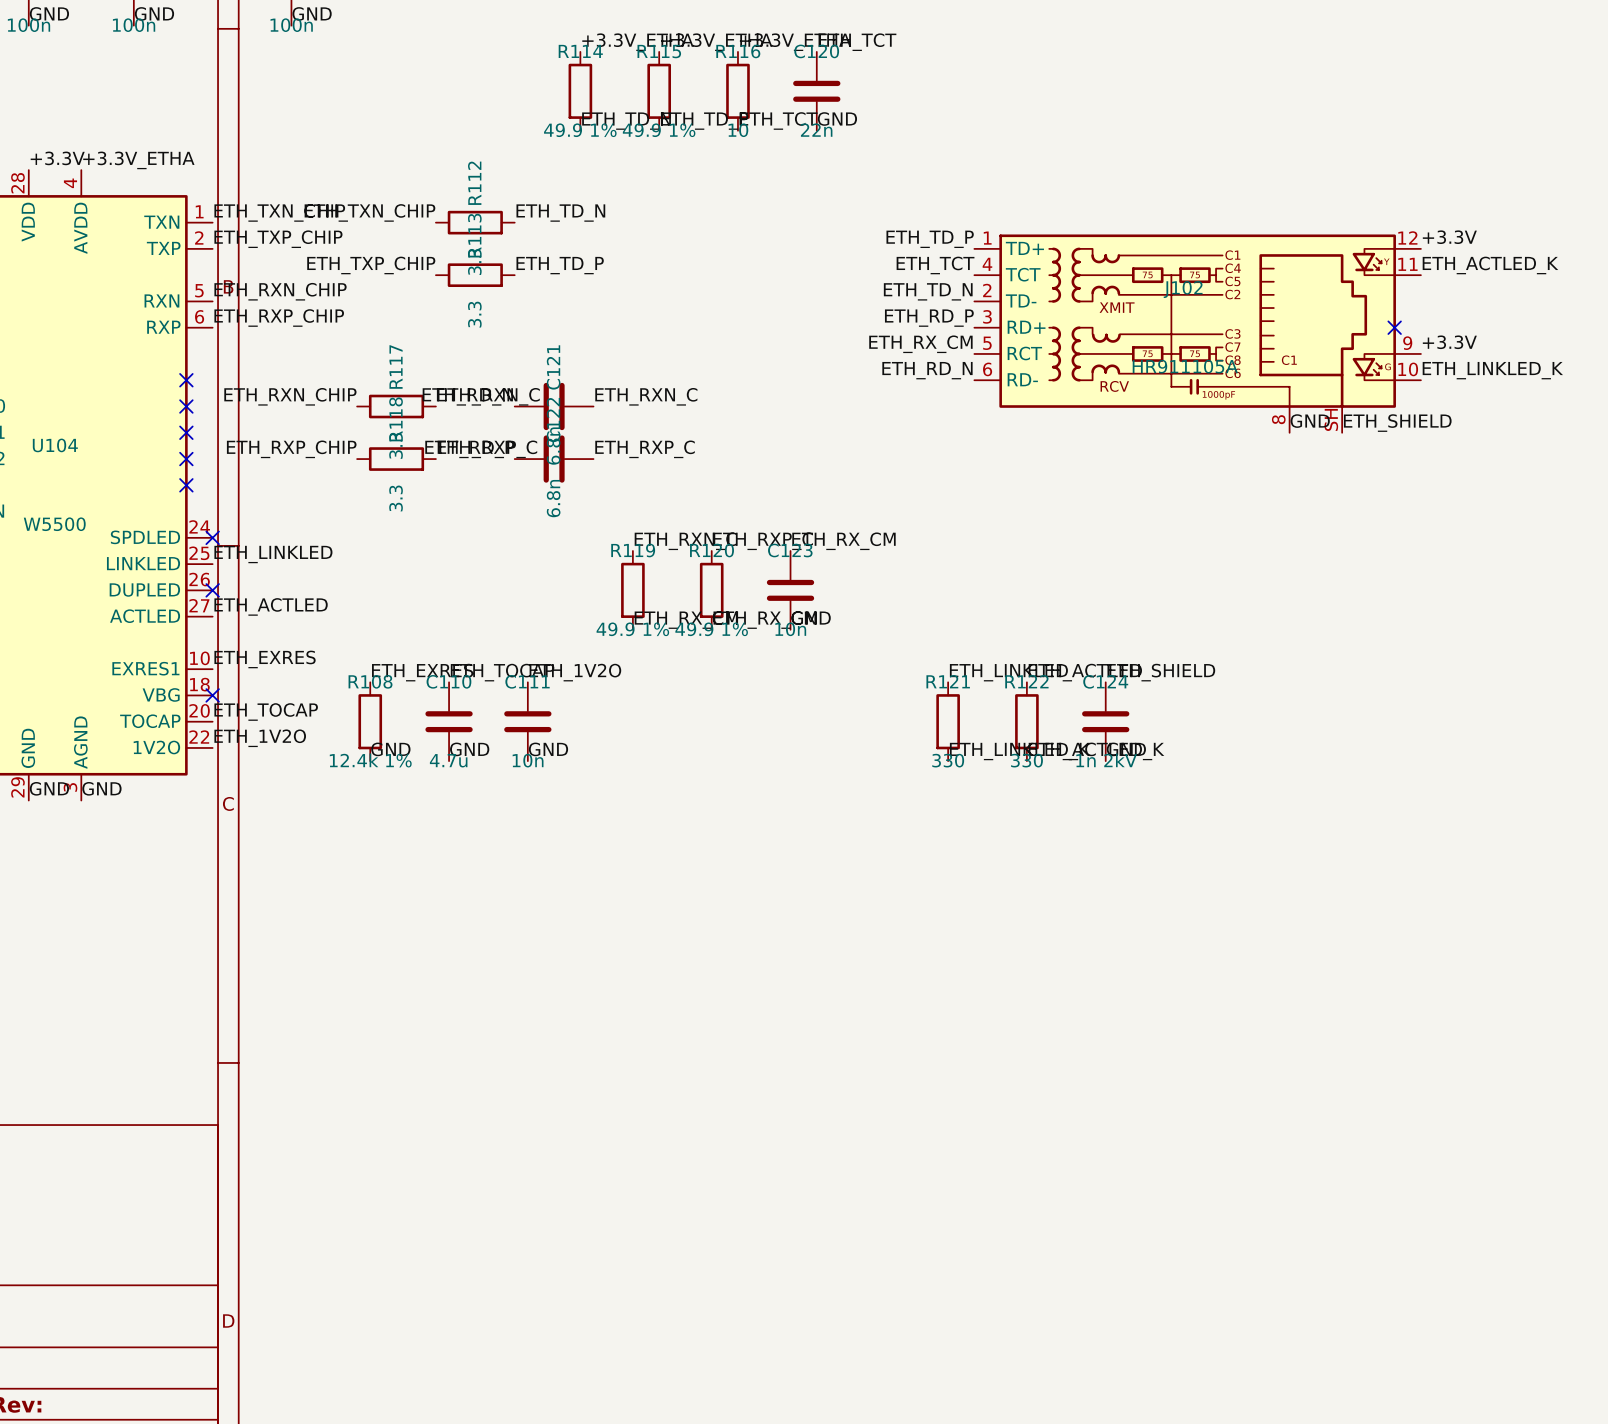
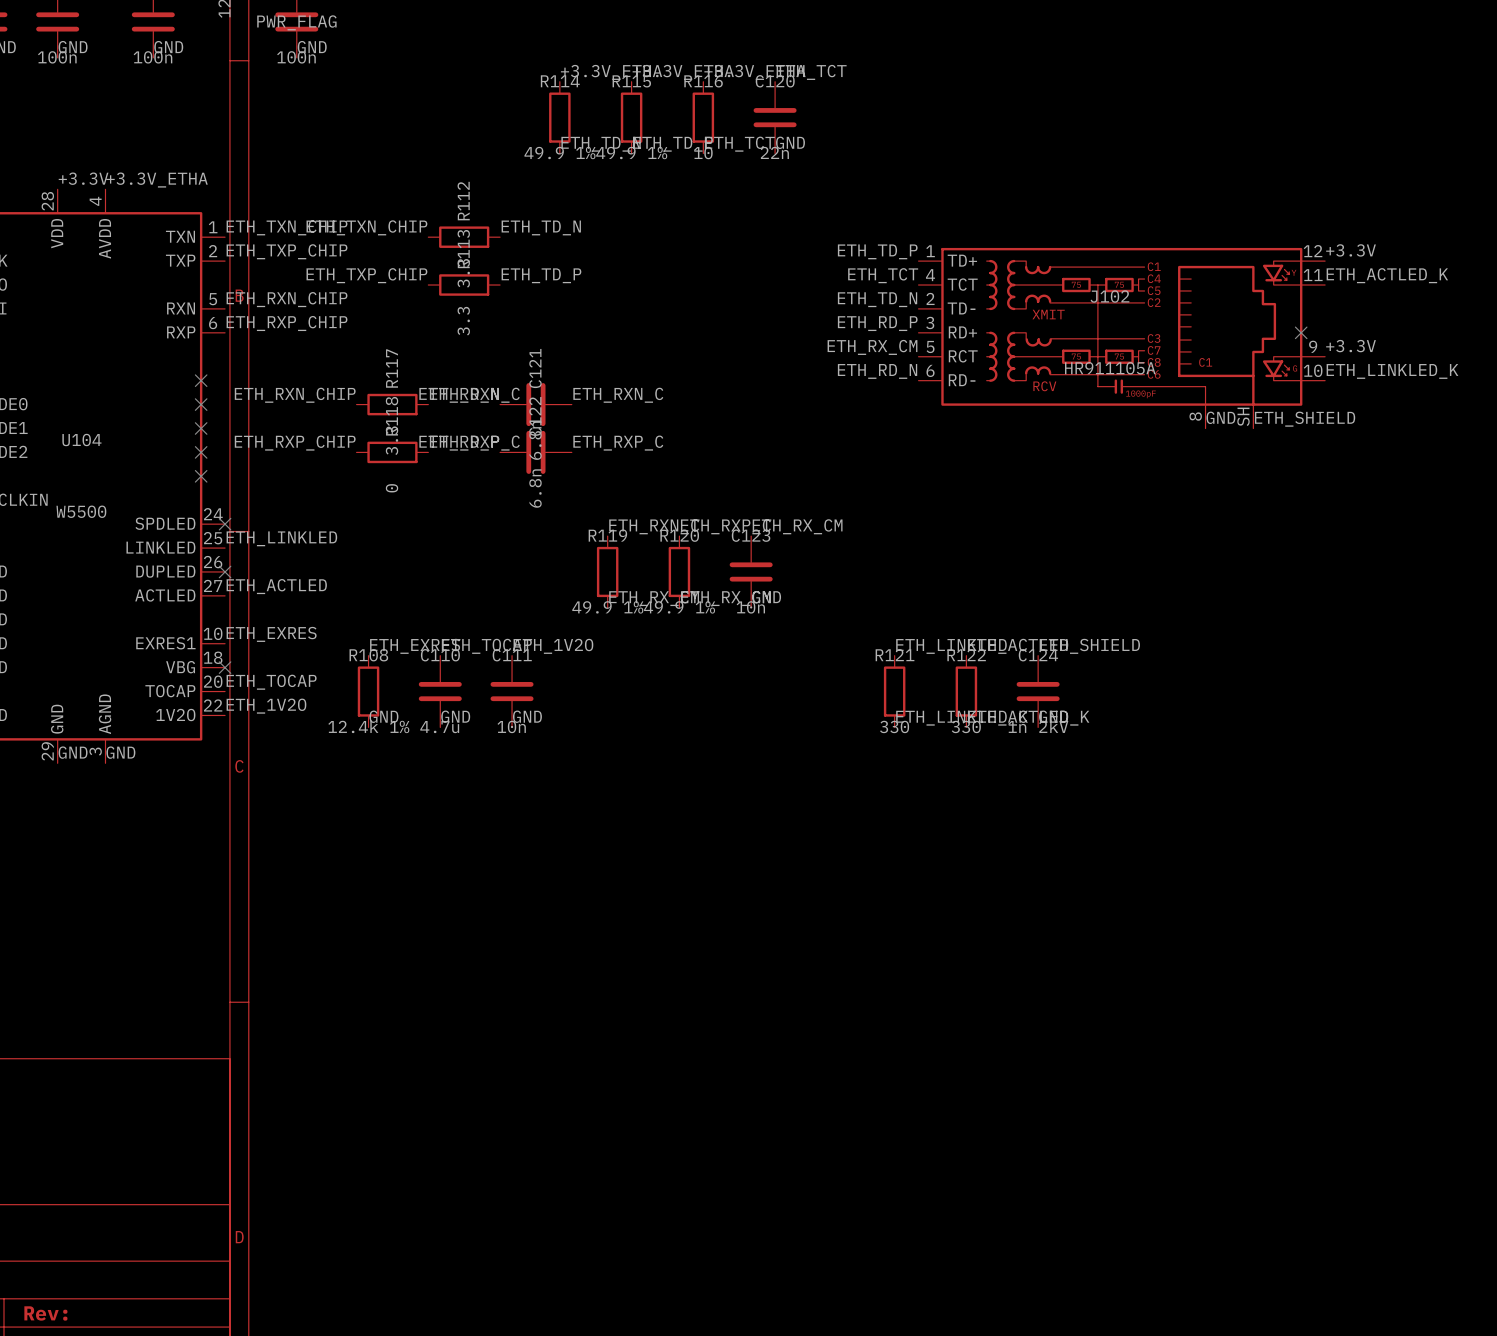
R118 value: 3.3 (396, 498) -> 0 (392, 488)

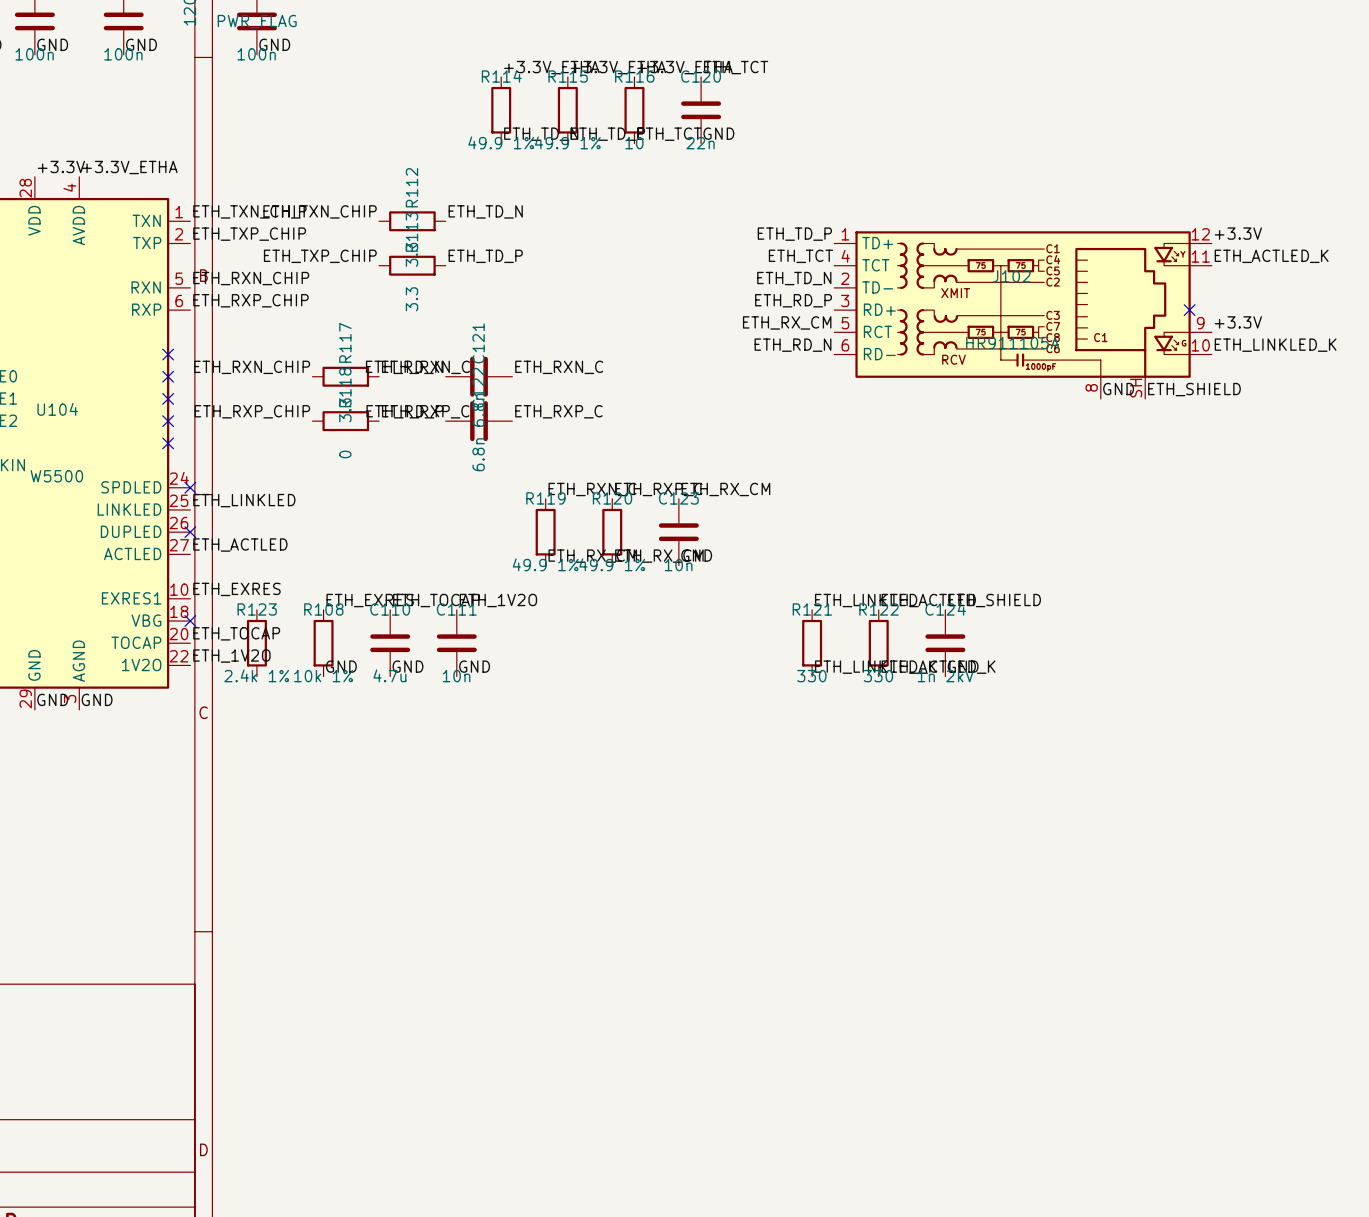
R123: none -> 2.4k 1% (256, 643)
R108 value: 12.4k 1% (368, 726) -> 10k 1% (323, 676)

